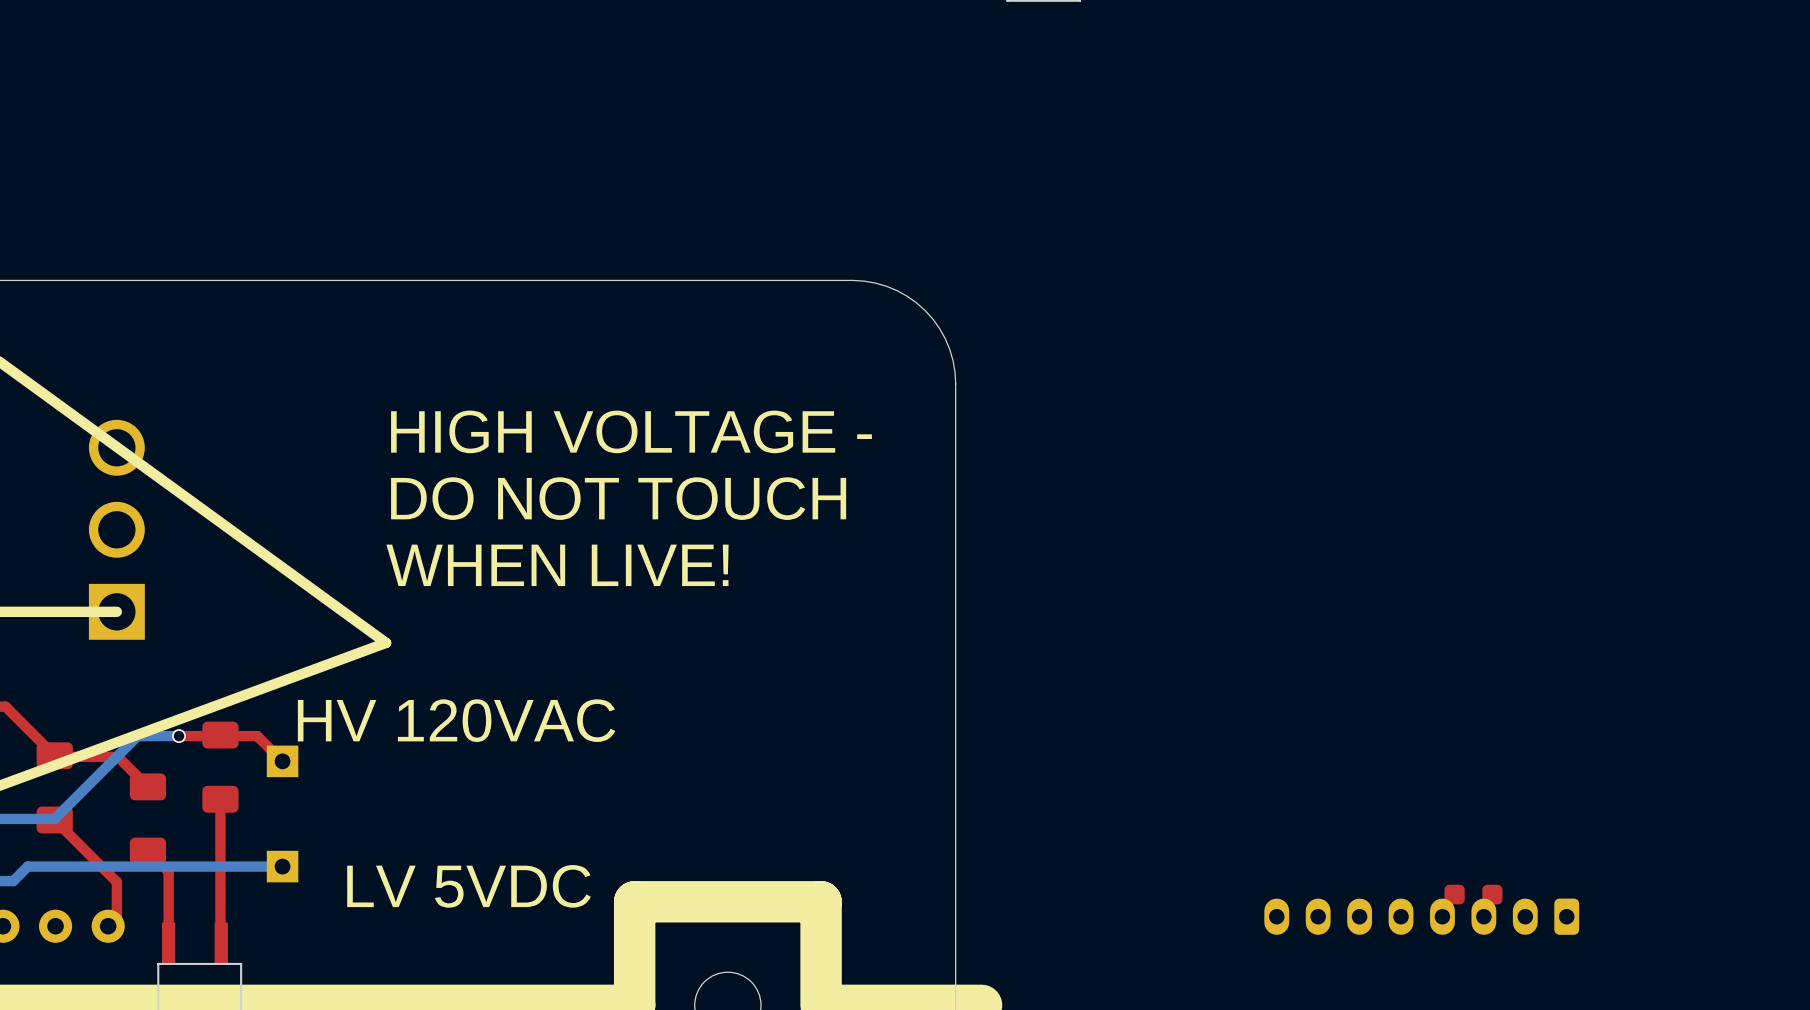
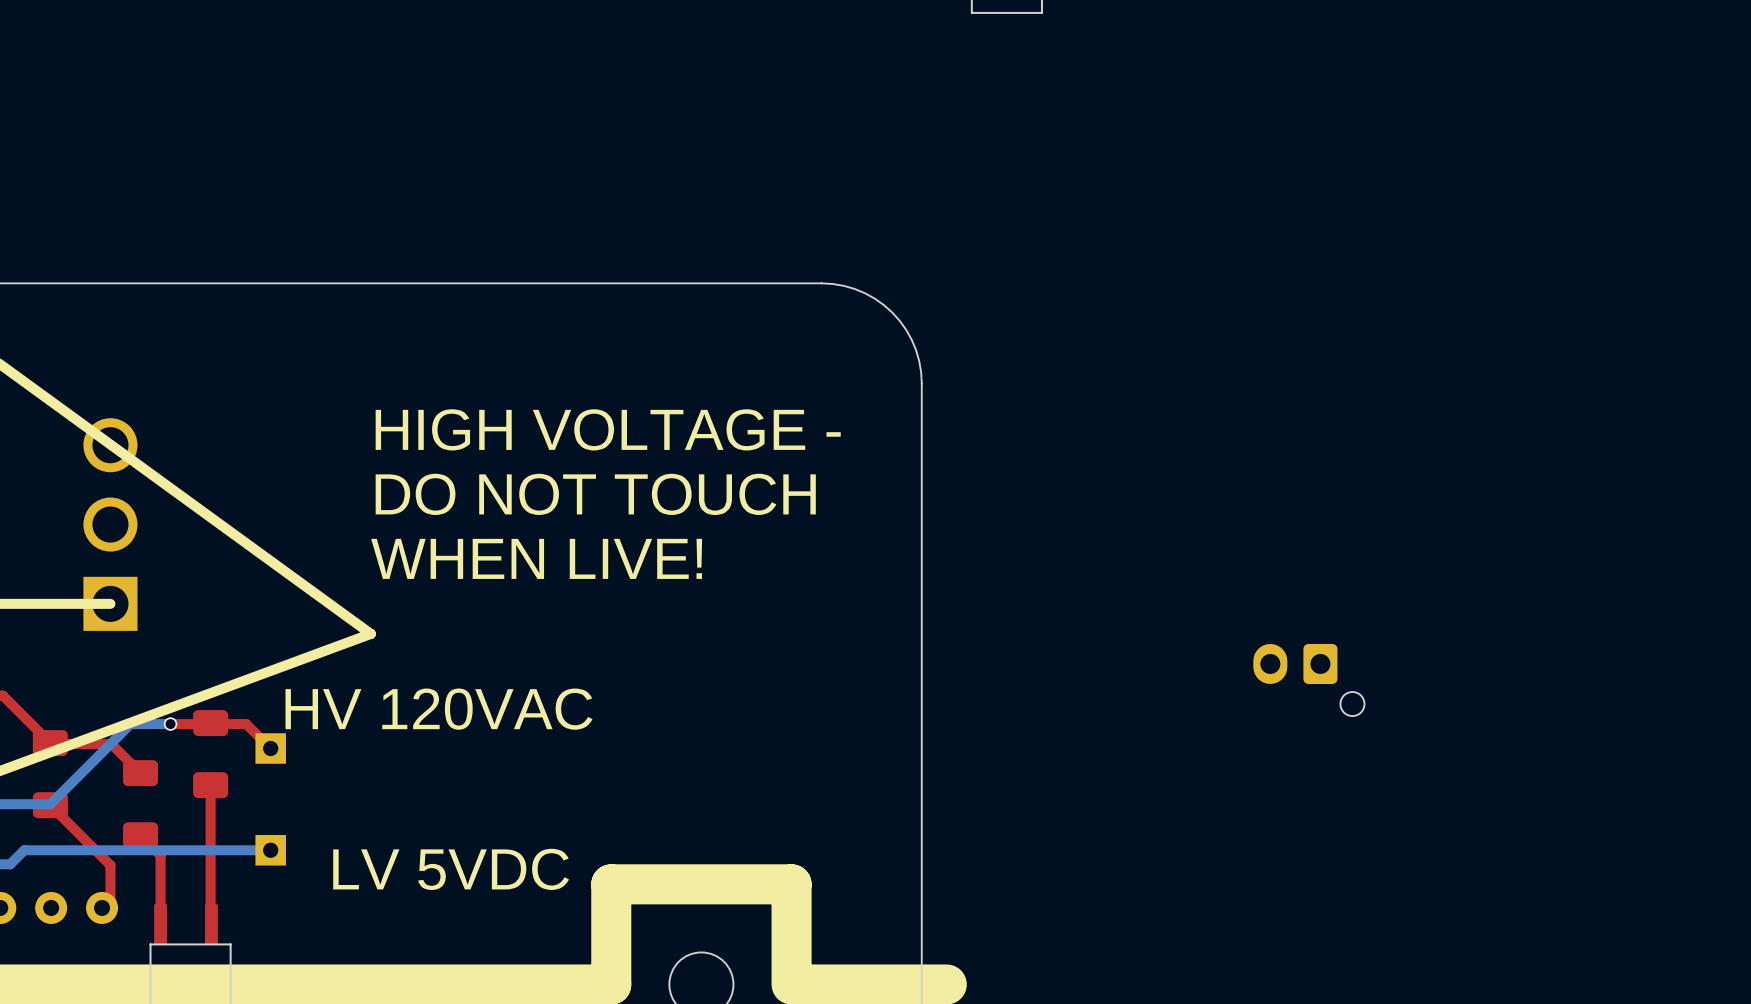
part: none -> (1308, 679)
part: (1473, 894) -> none
part: (1421, 916) -> none

